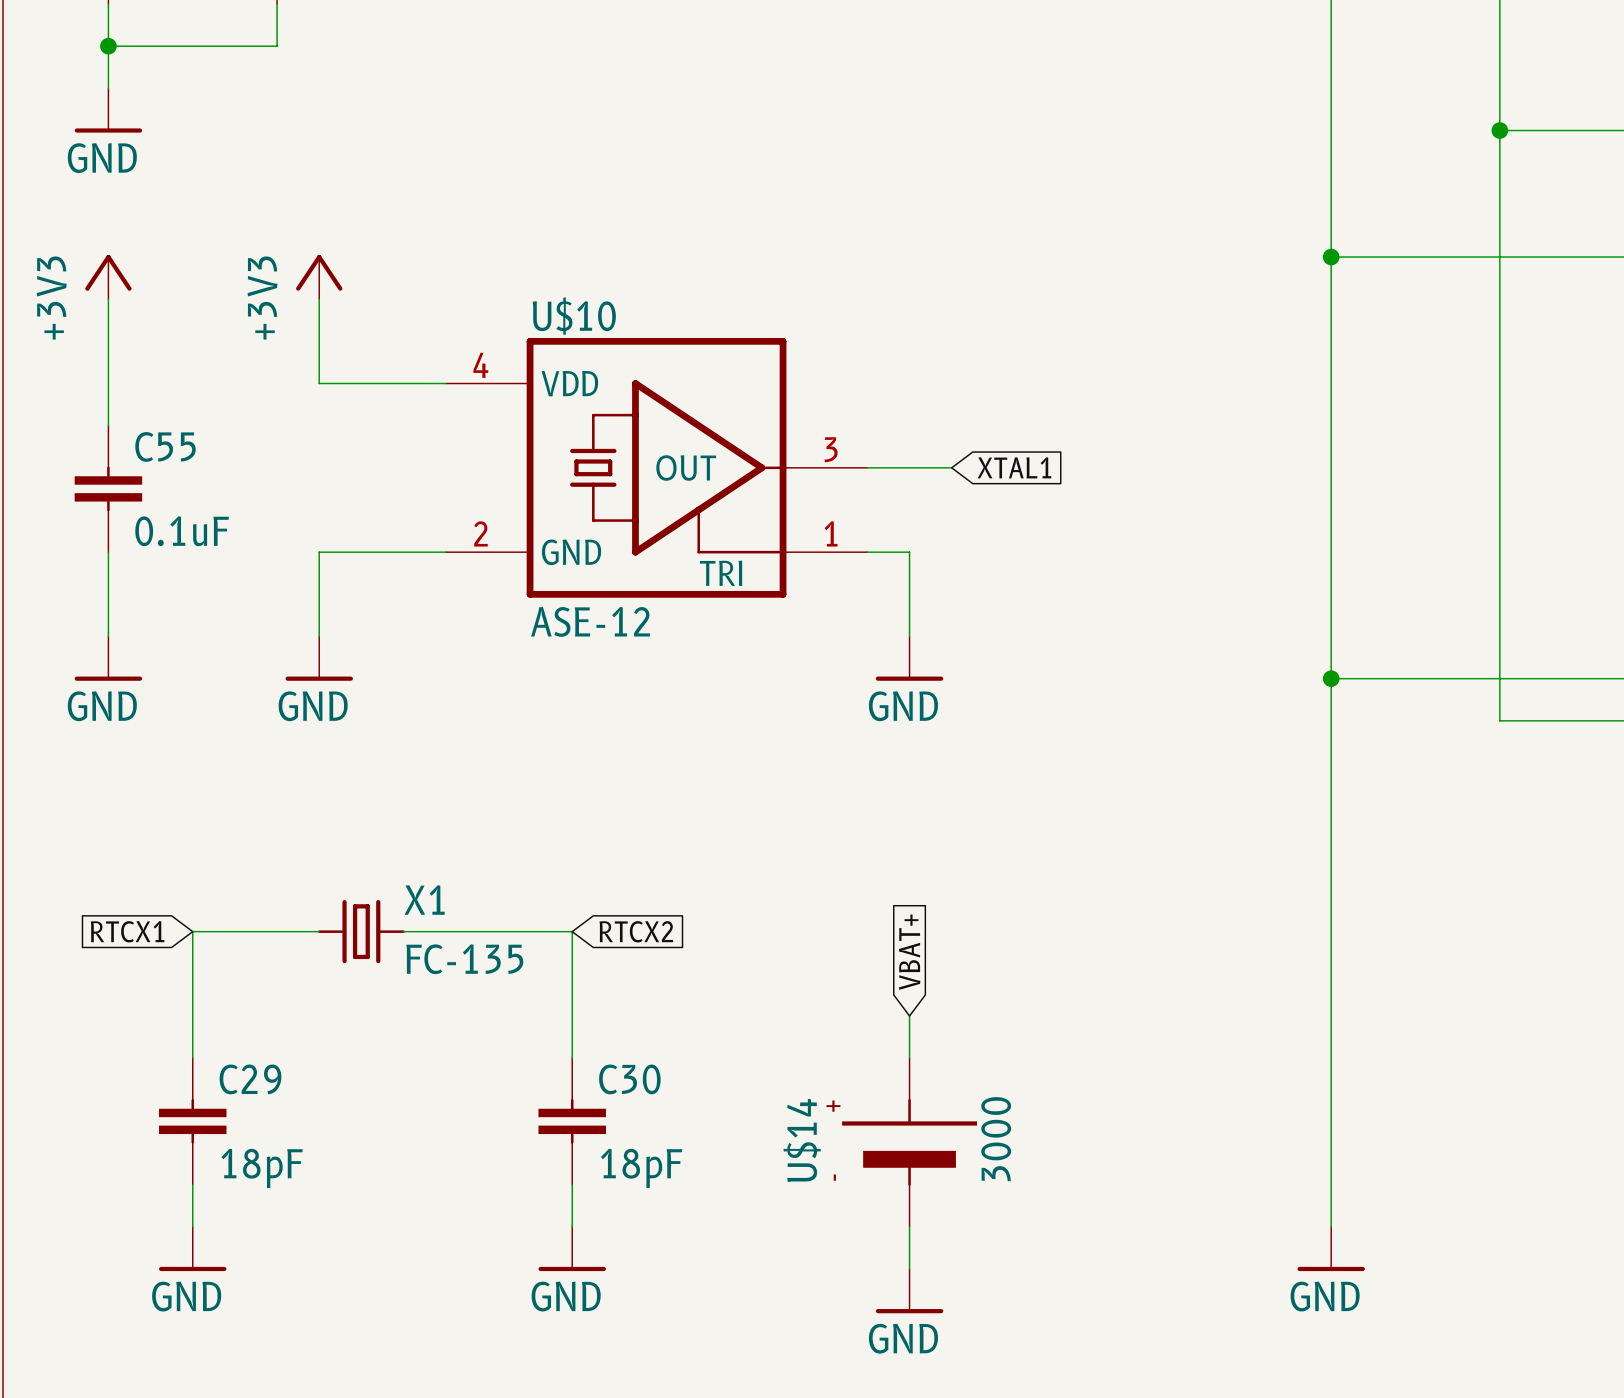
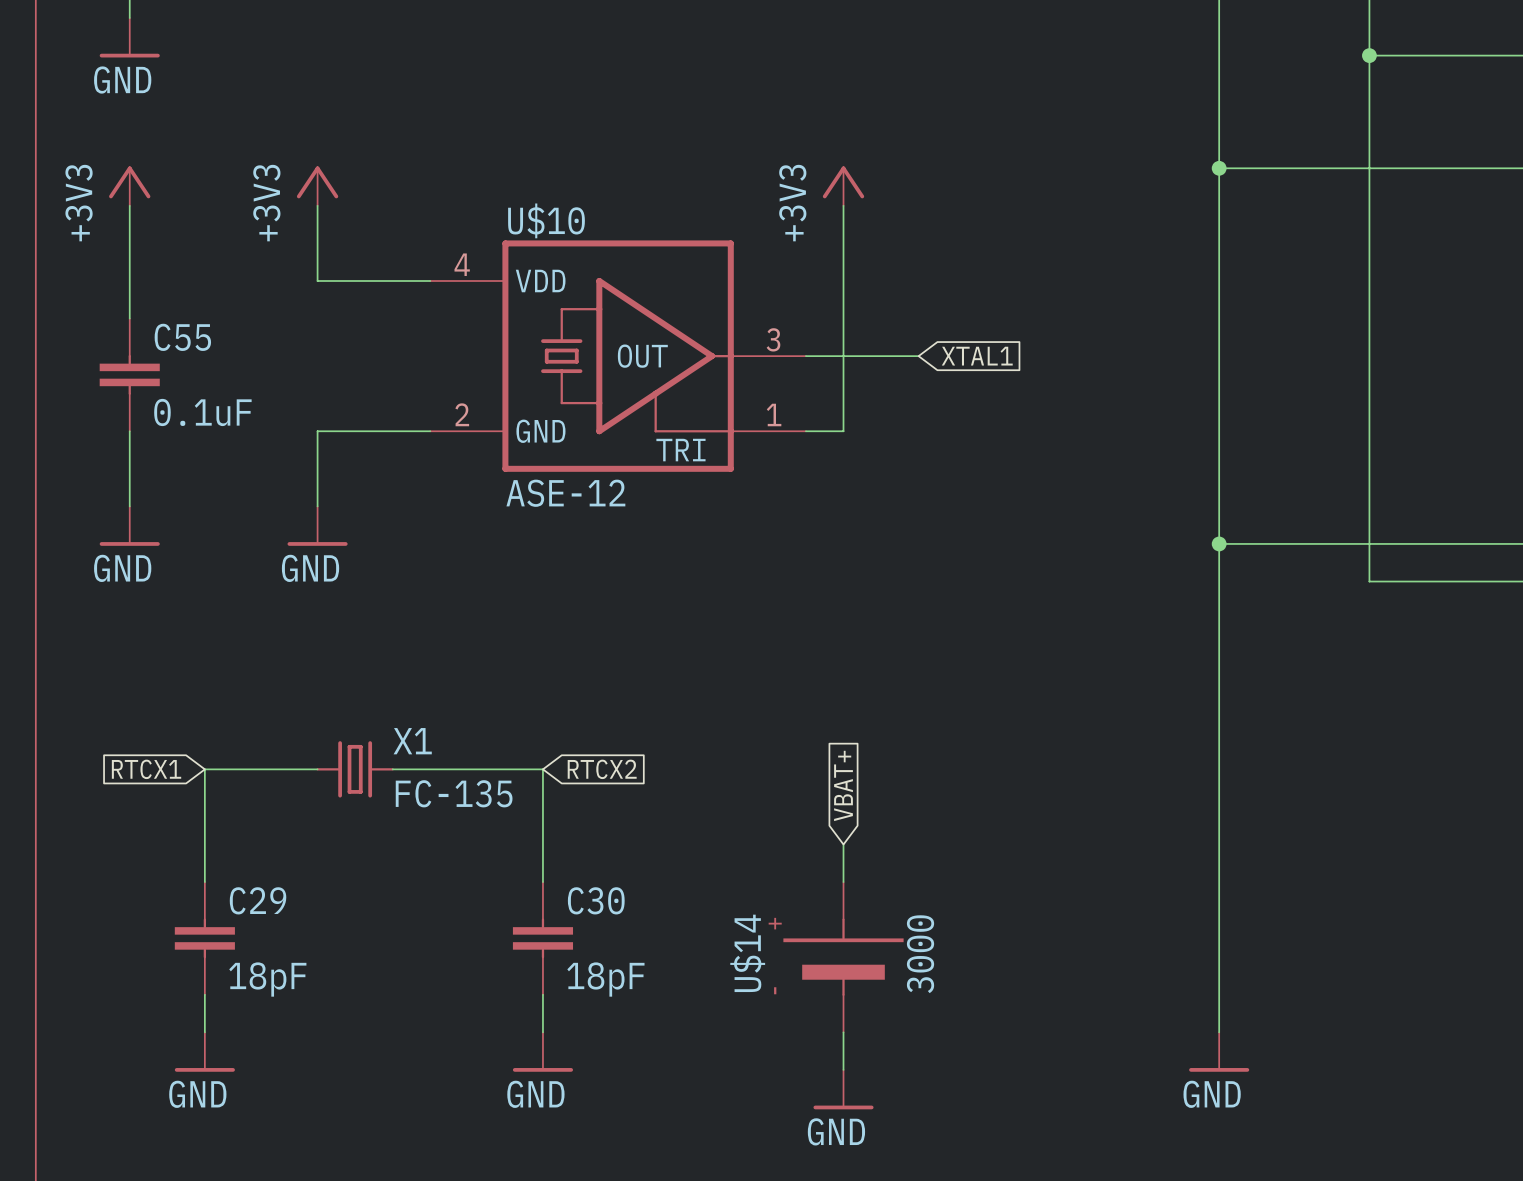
power symbol: none -> +3V3 (843, 186)
wire: none -> (881, 356) (918, 356)
global label position: XTAL1 (1014, 467) -> XTAL1 (977, 356)
wire: (909, 552) (909, 636) -> (843, 431) (843, 205)
power symbol: GND (909, 658) -> none

